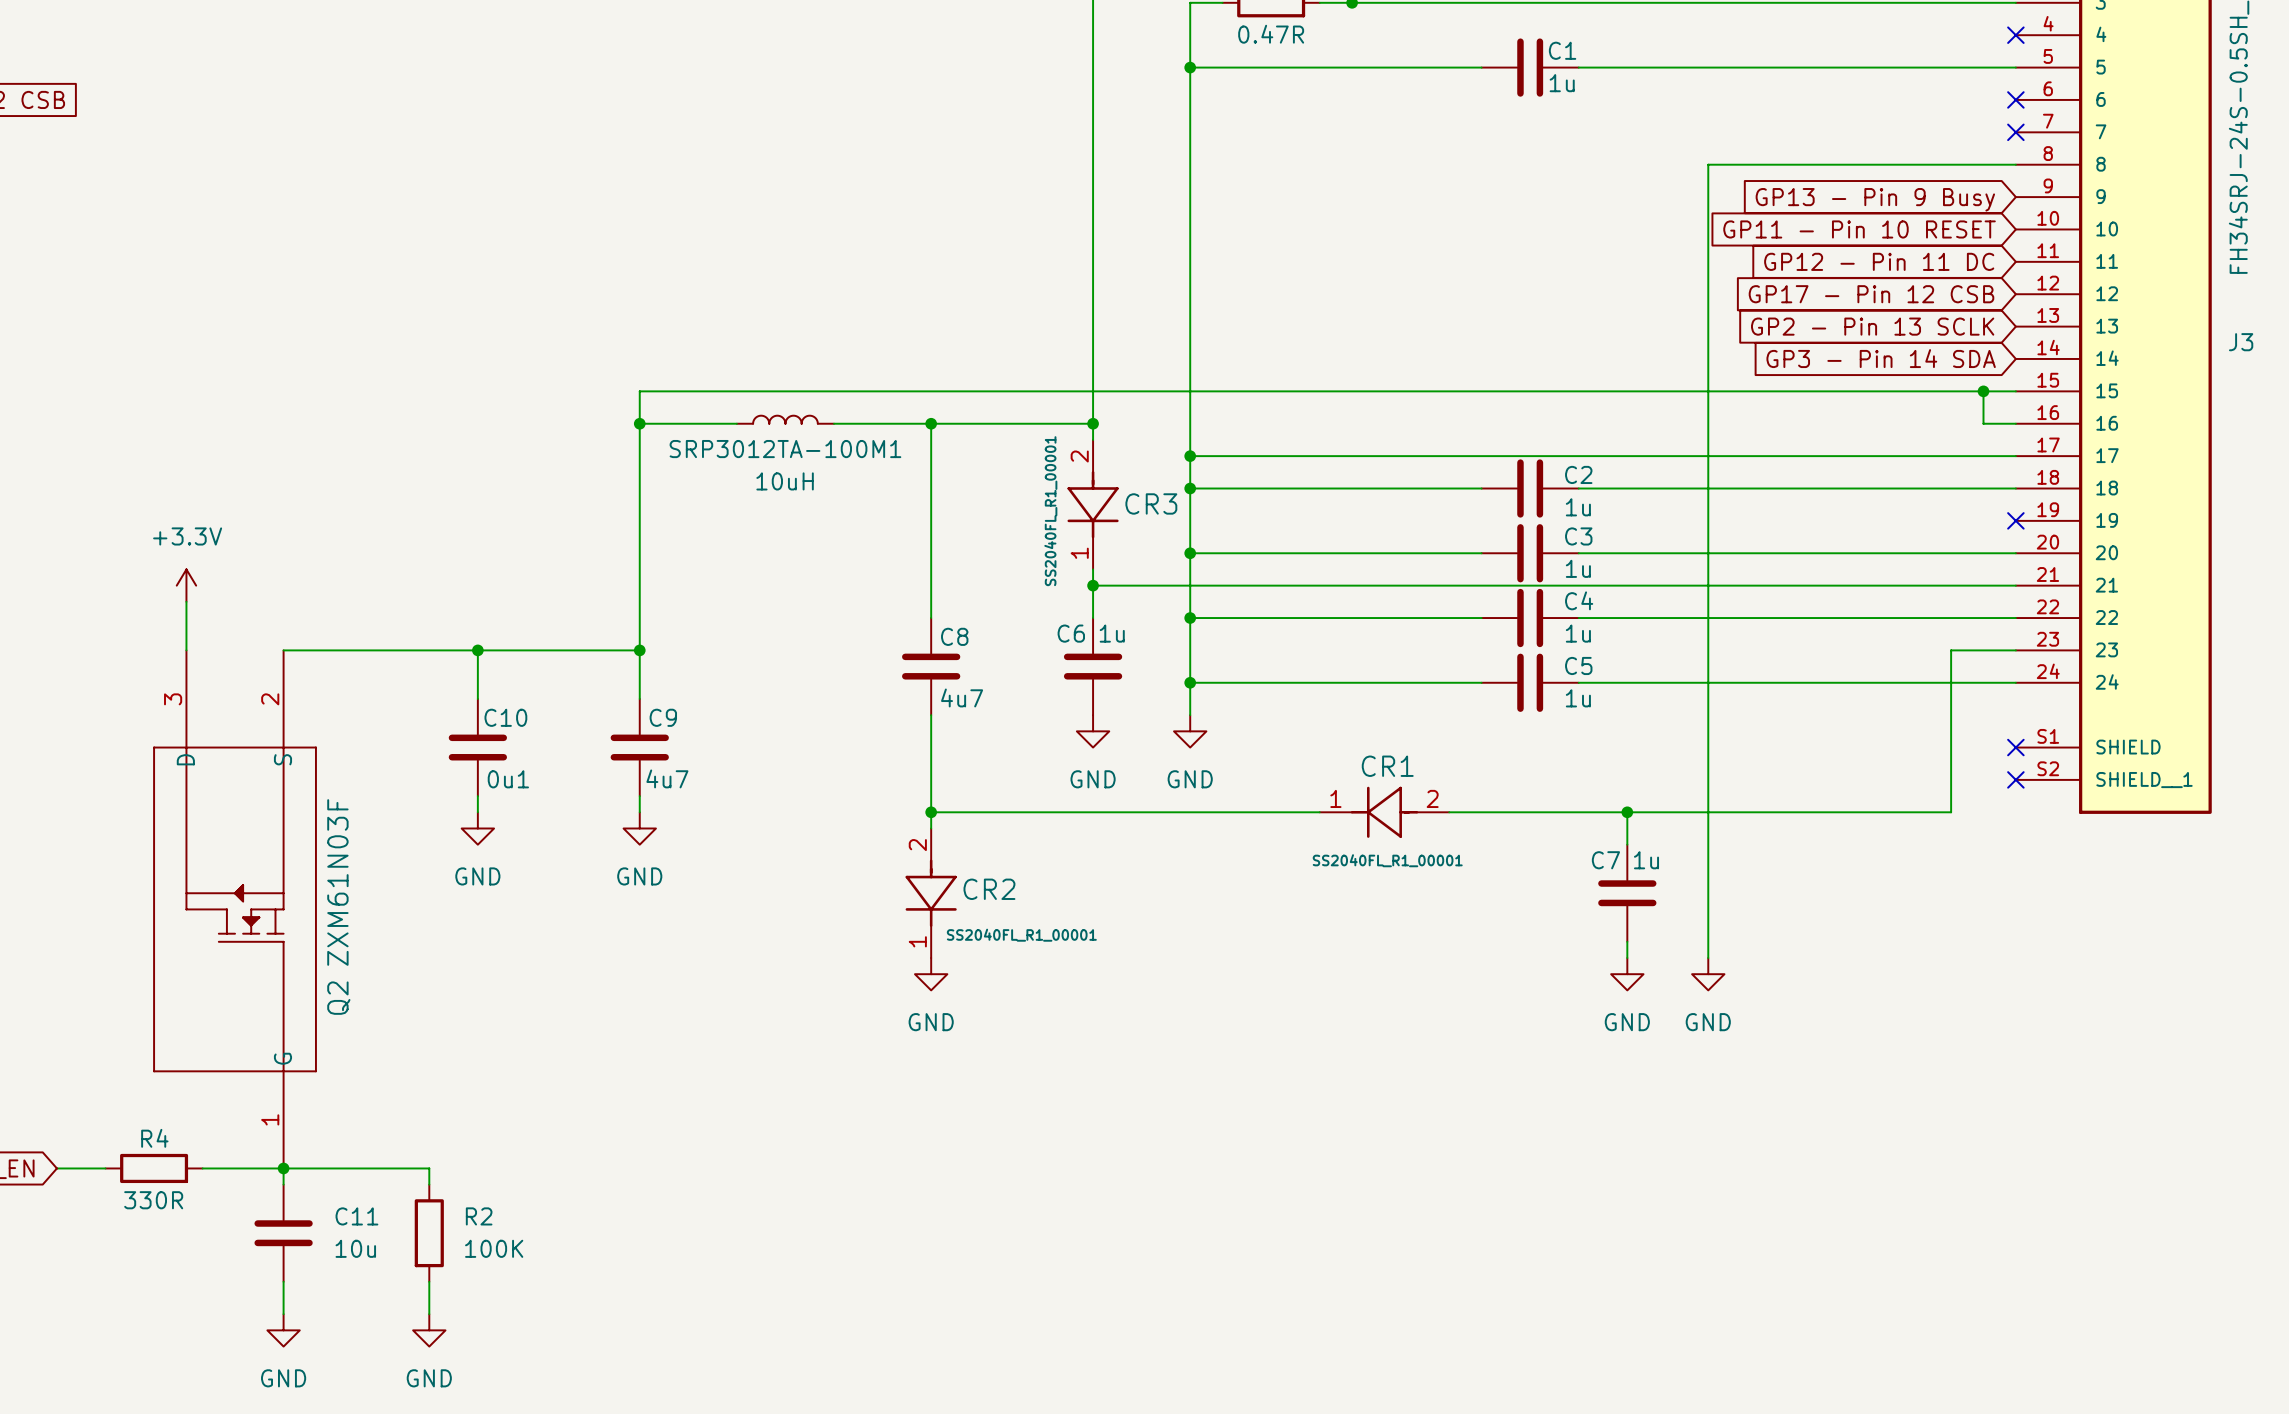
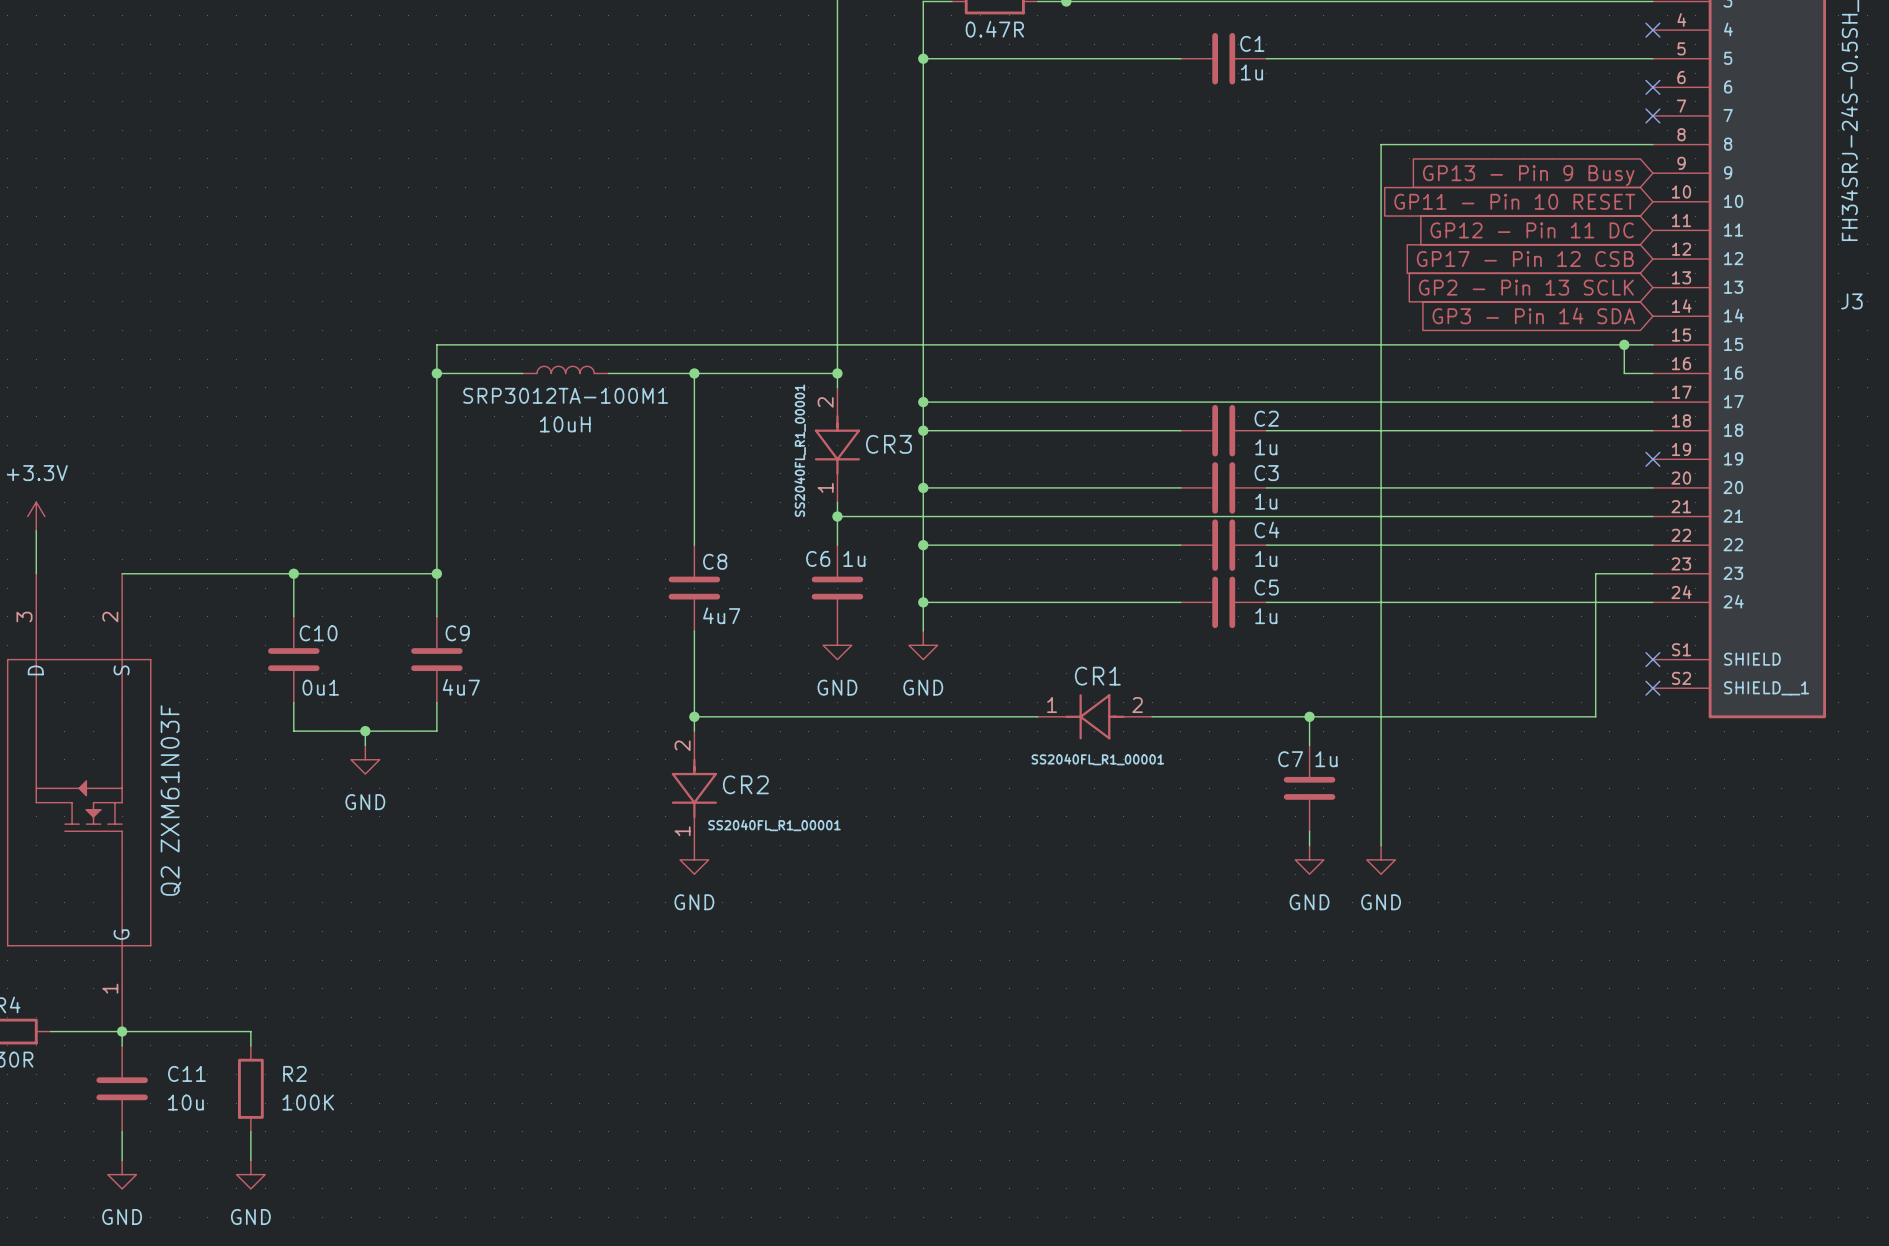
wire: none -> (293, 716) (293, 731) (436, 731) (436, 716)
power symbol: GND (477, 828) -> none
wire: none -> (365, 731) (365, 745)
junction: none -> (365, 731)
power symbol: GND (639, 828) -> none
power symbol: none -> GND (365, 759)

